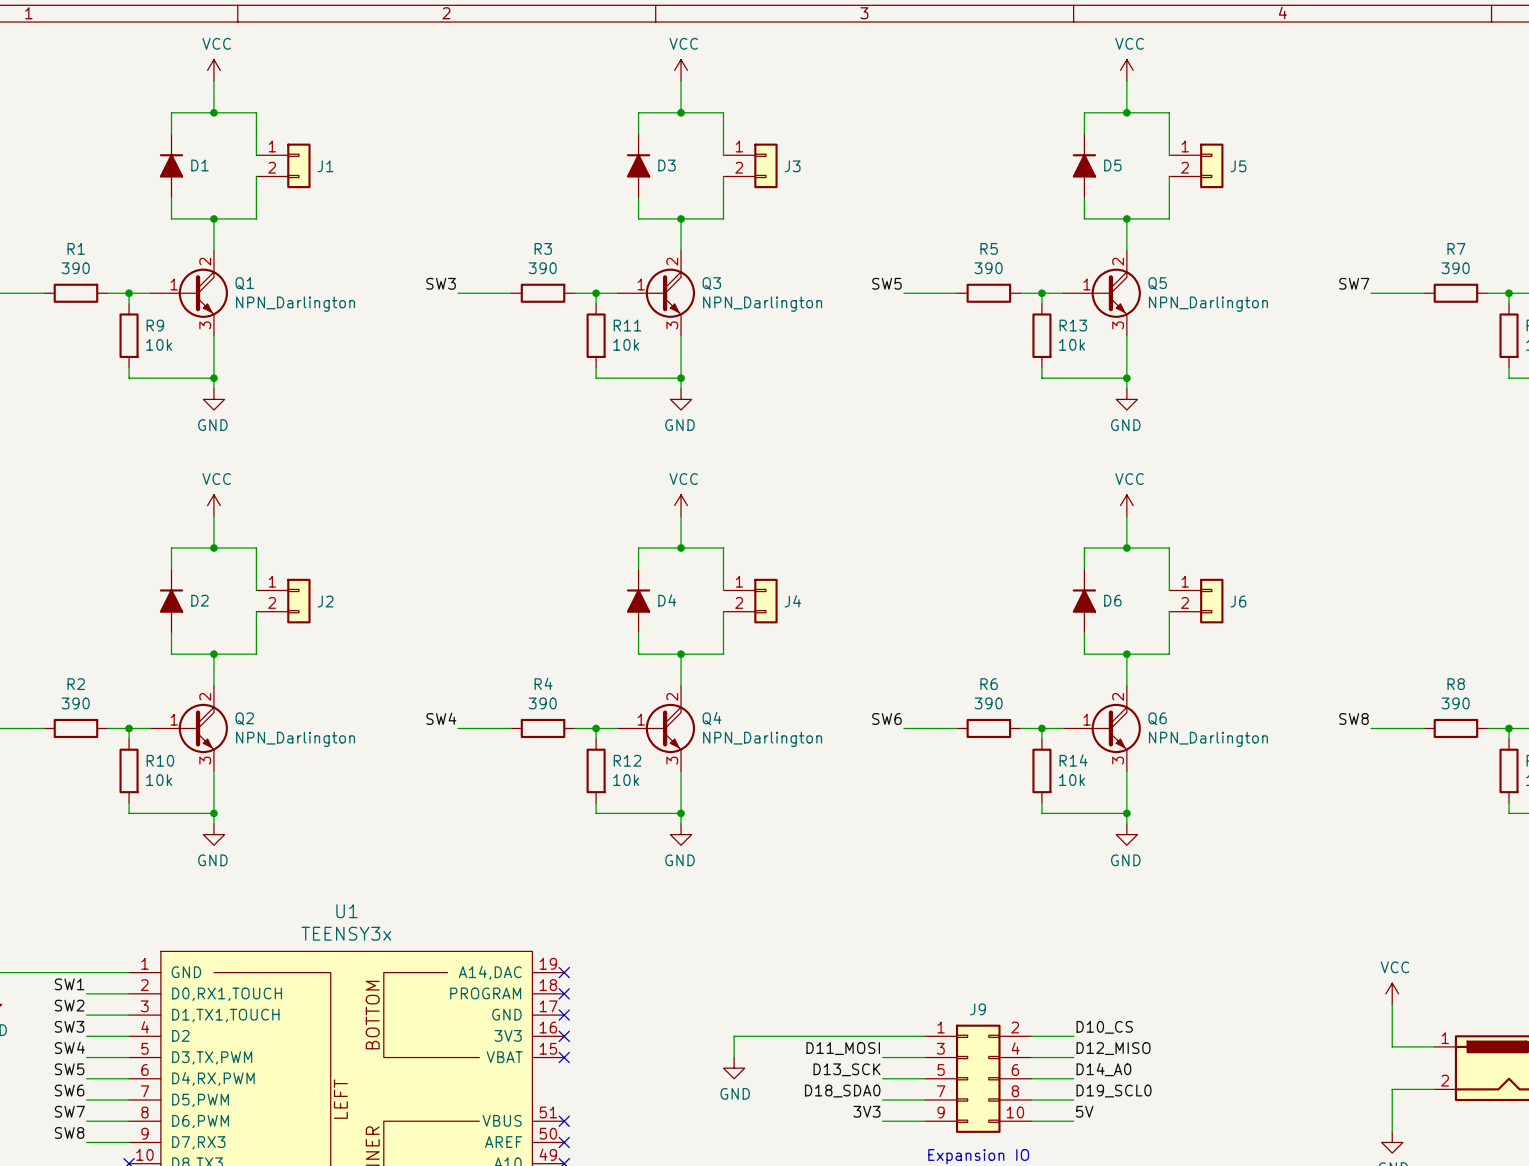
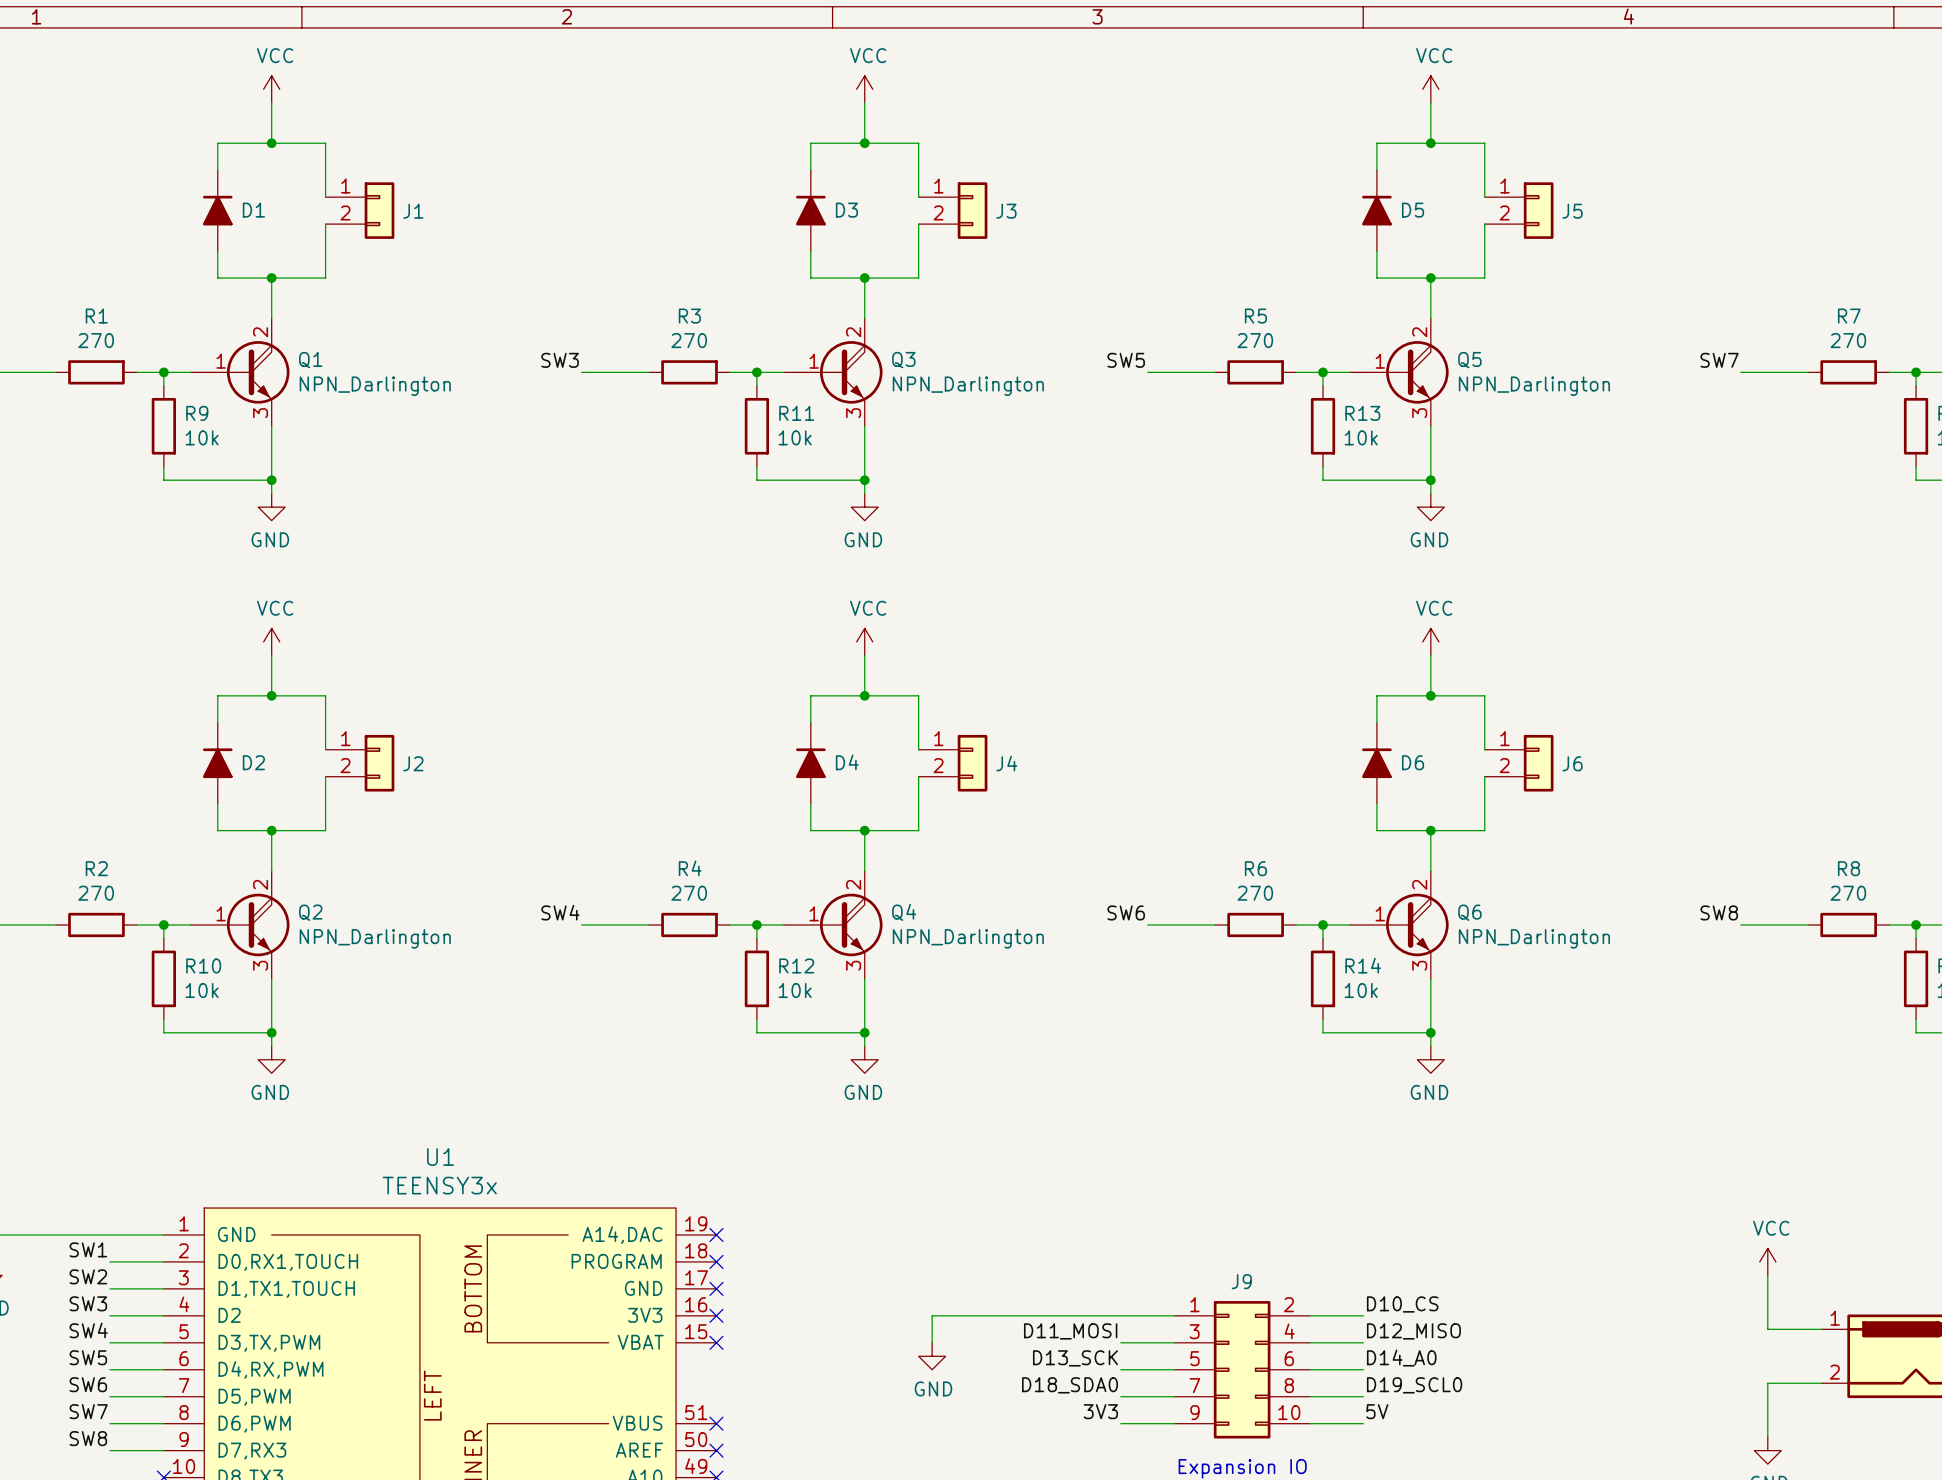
R1 value: 390 (75, 268) -> 270 (96, 340)
R3 value: 390 (542, 268) -> 270 (689, 340)
R5 value: 390 (988, 268) -> 270 (1255, 340)
R7 value: 390 (1455, 268) -> 270 (1848, 340)
R2 value: 390 (75, 703) -> 270 (96, 893)
R4 value: 390 (542, 703) -> 270 (689, 893)
R6 value: 390 (988, 703) -> 270 (1255, 893)
R8 value: 390 (1455, 703) -> 270 (1848, 893)

